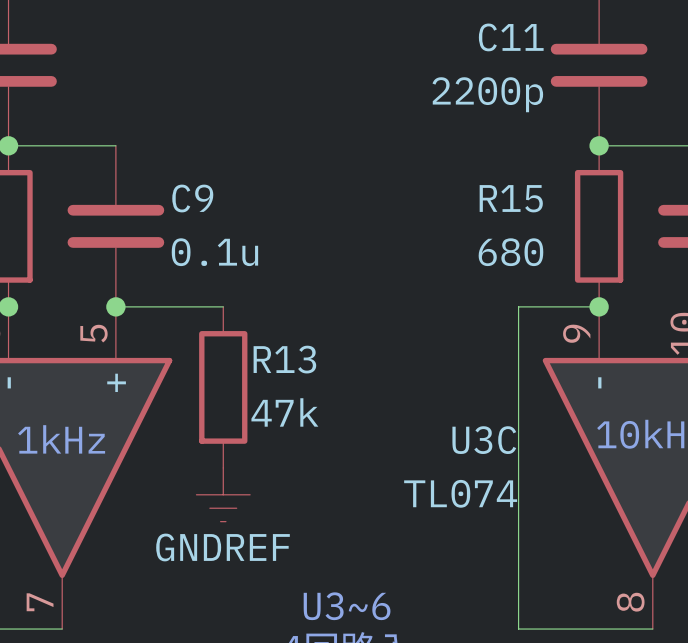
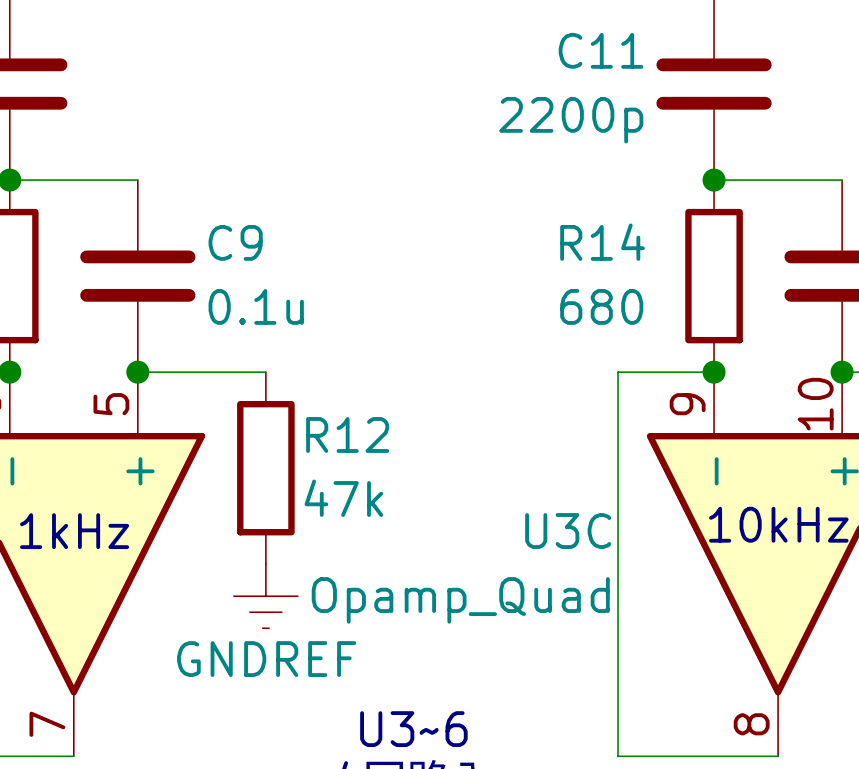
R15 name: R15 (511, 198) -> R14 (602, 242)
R13 name: R13 (284, 359) -> R12 (347, 434)
U3C value: TL074 (460, 493) -> Opamp_Quad (460, 600)

